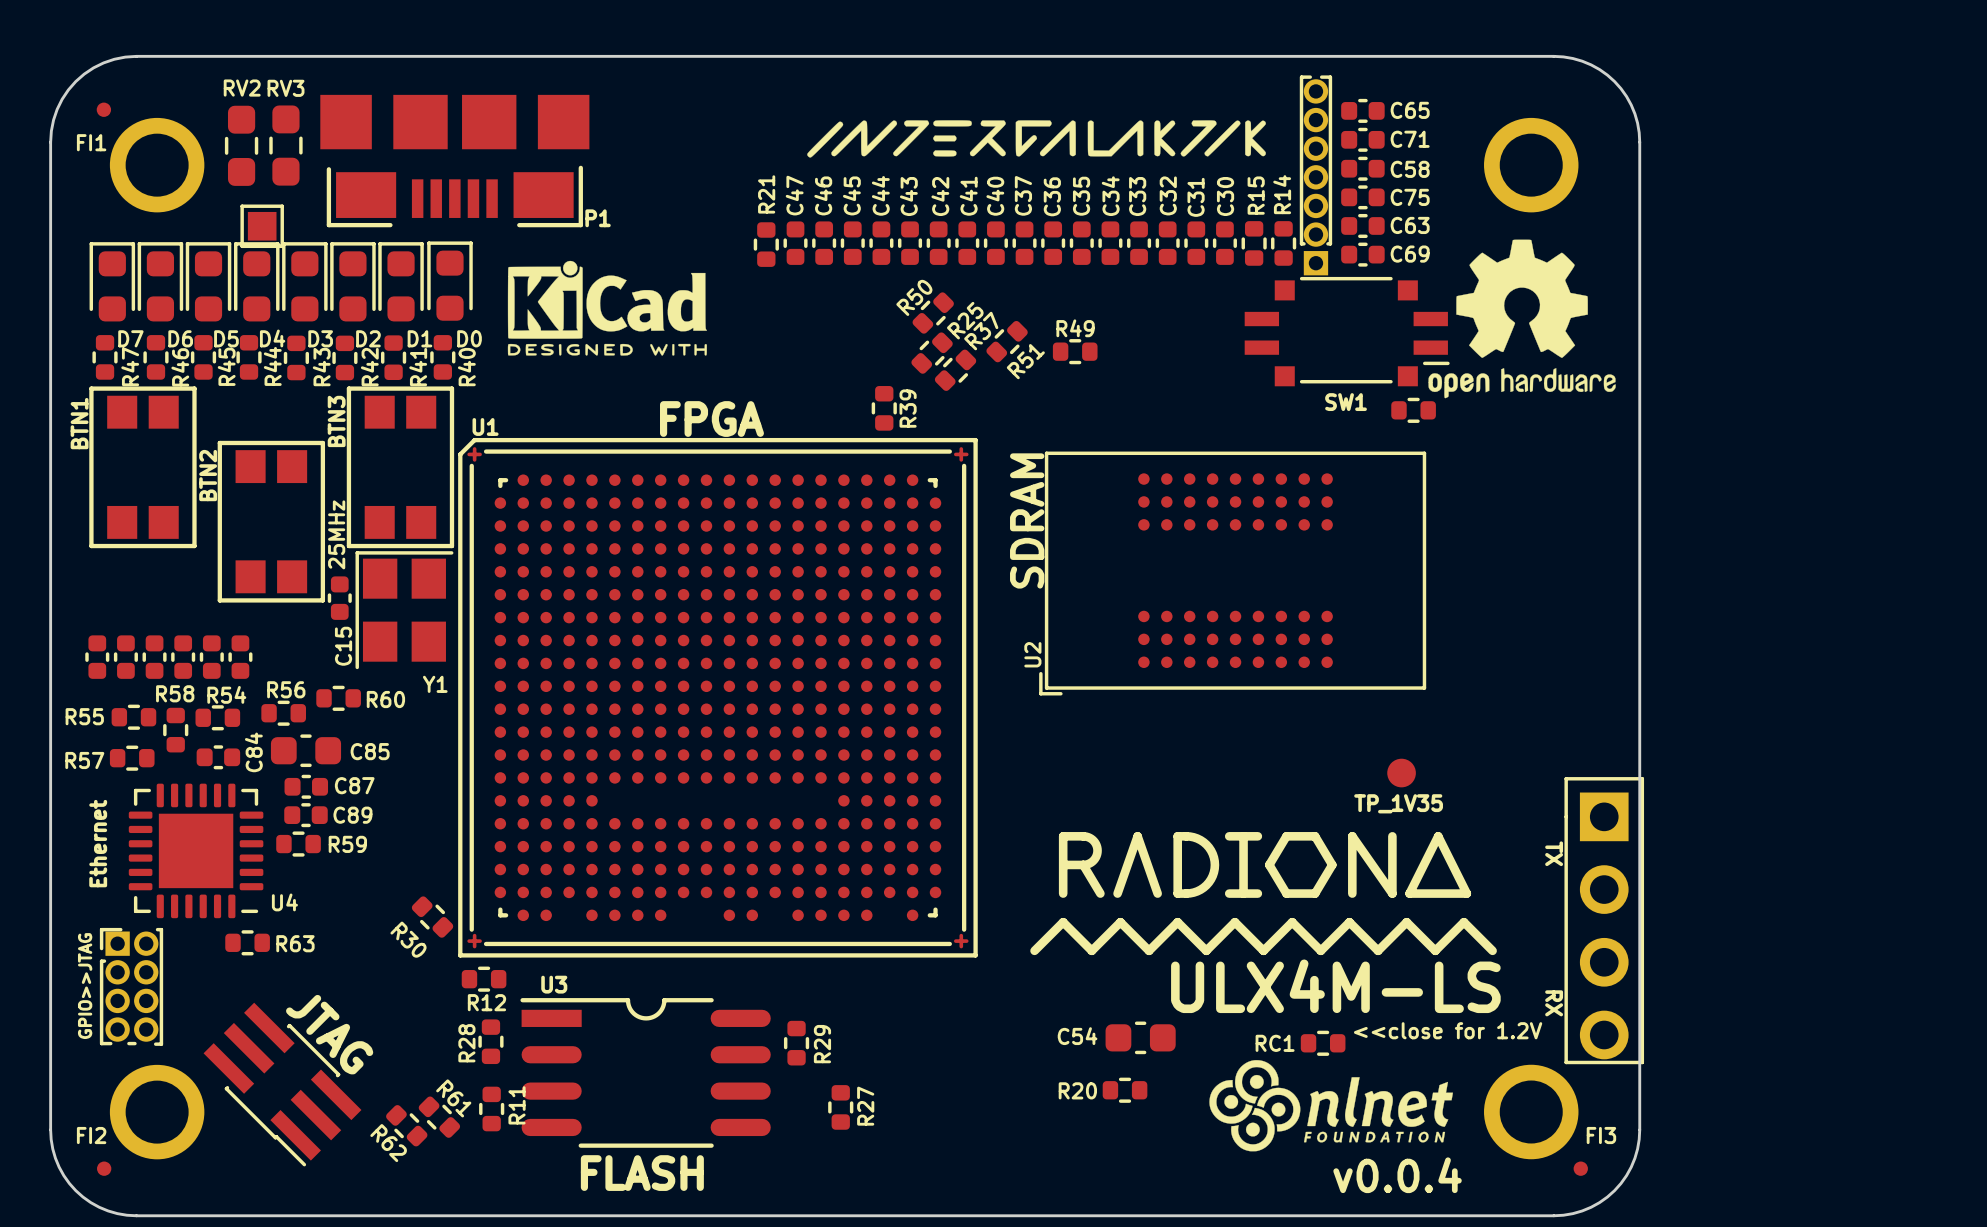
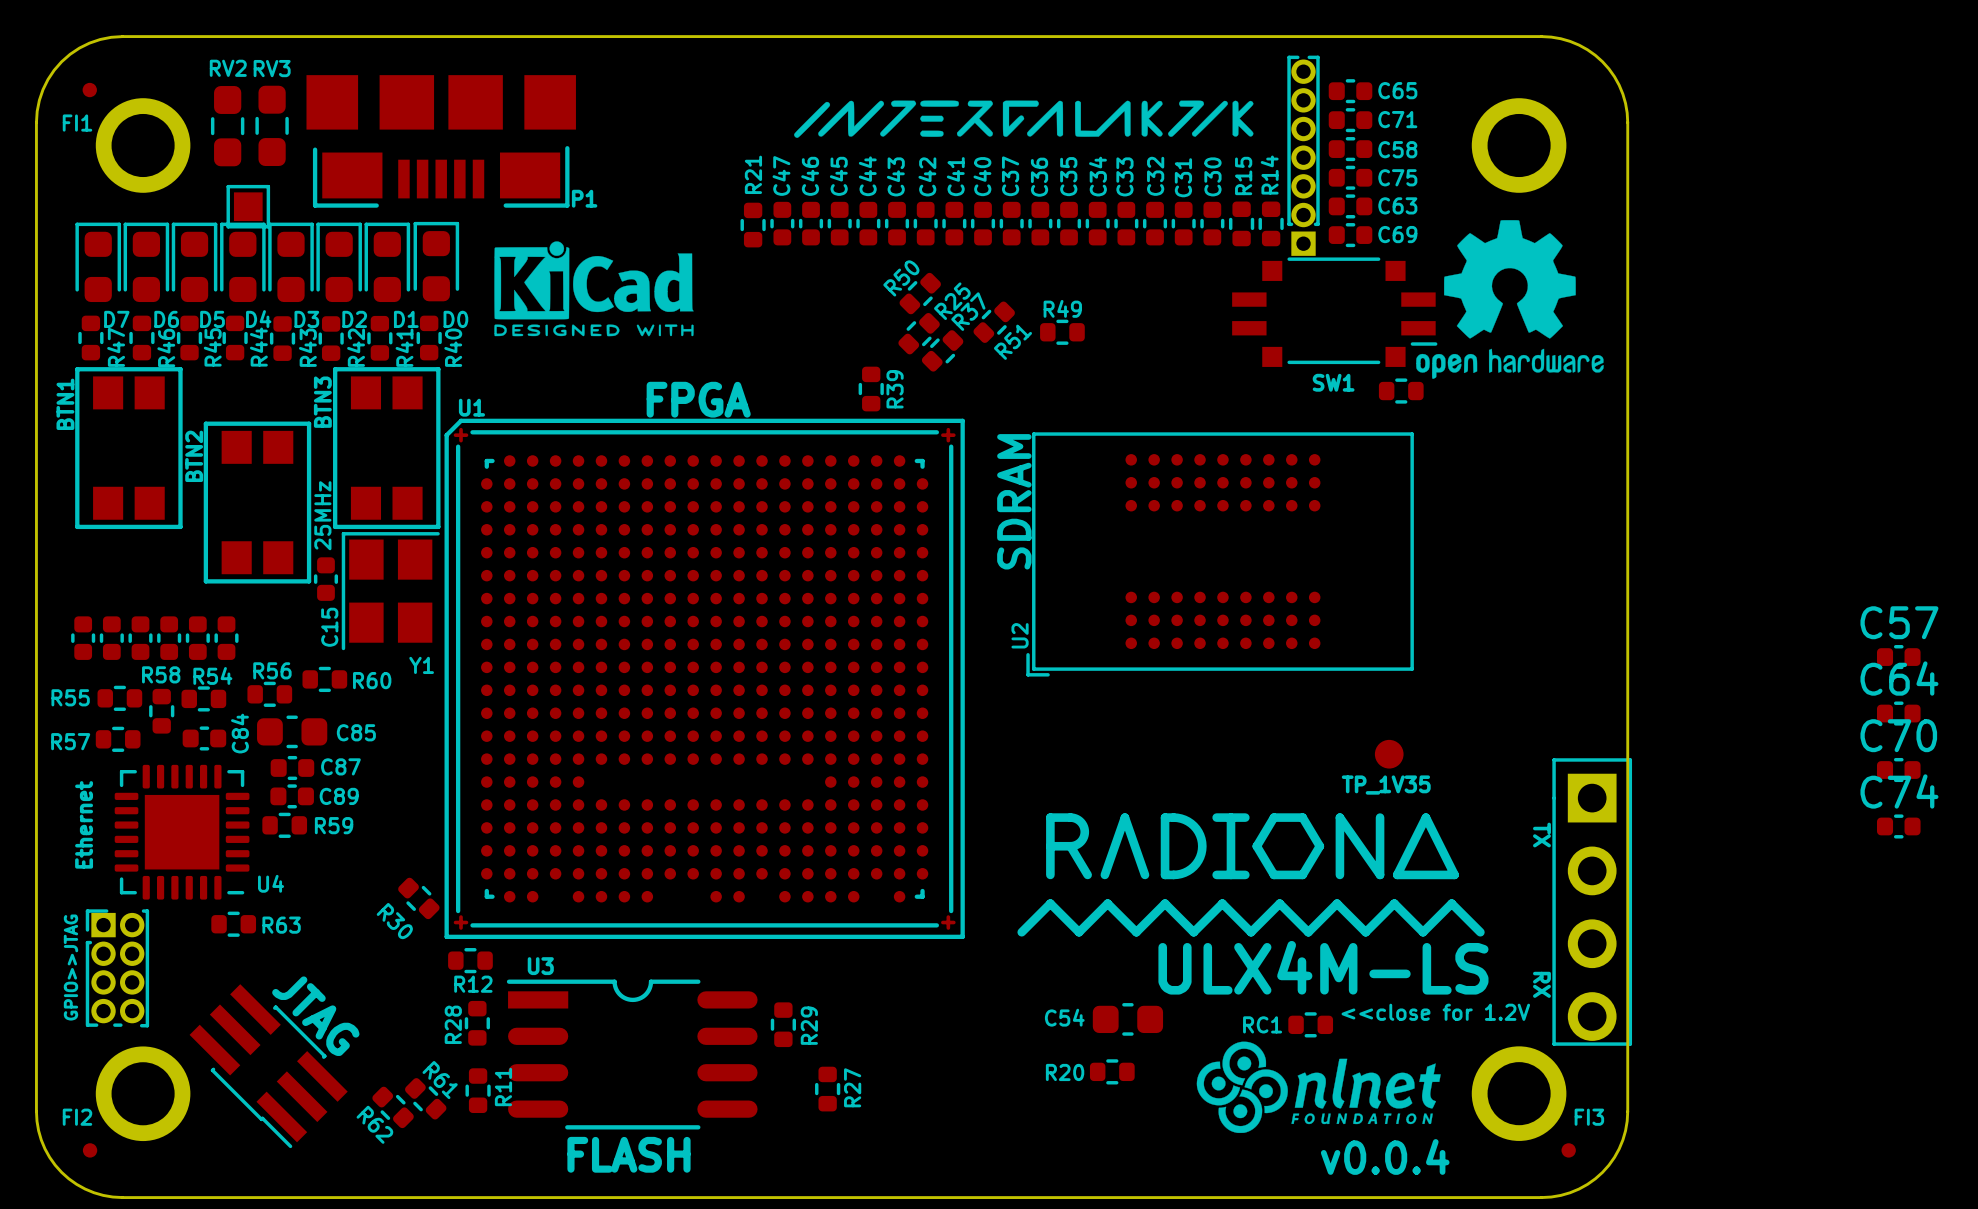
C57: none -> (1898, 657)
C64: none -> (1898, 713)
C70: none -> (1898, 770)
C74: none -> (1898, 826)

